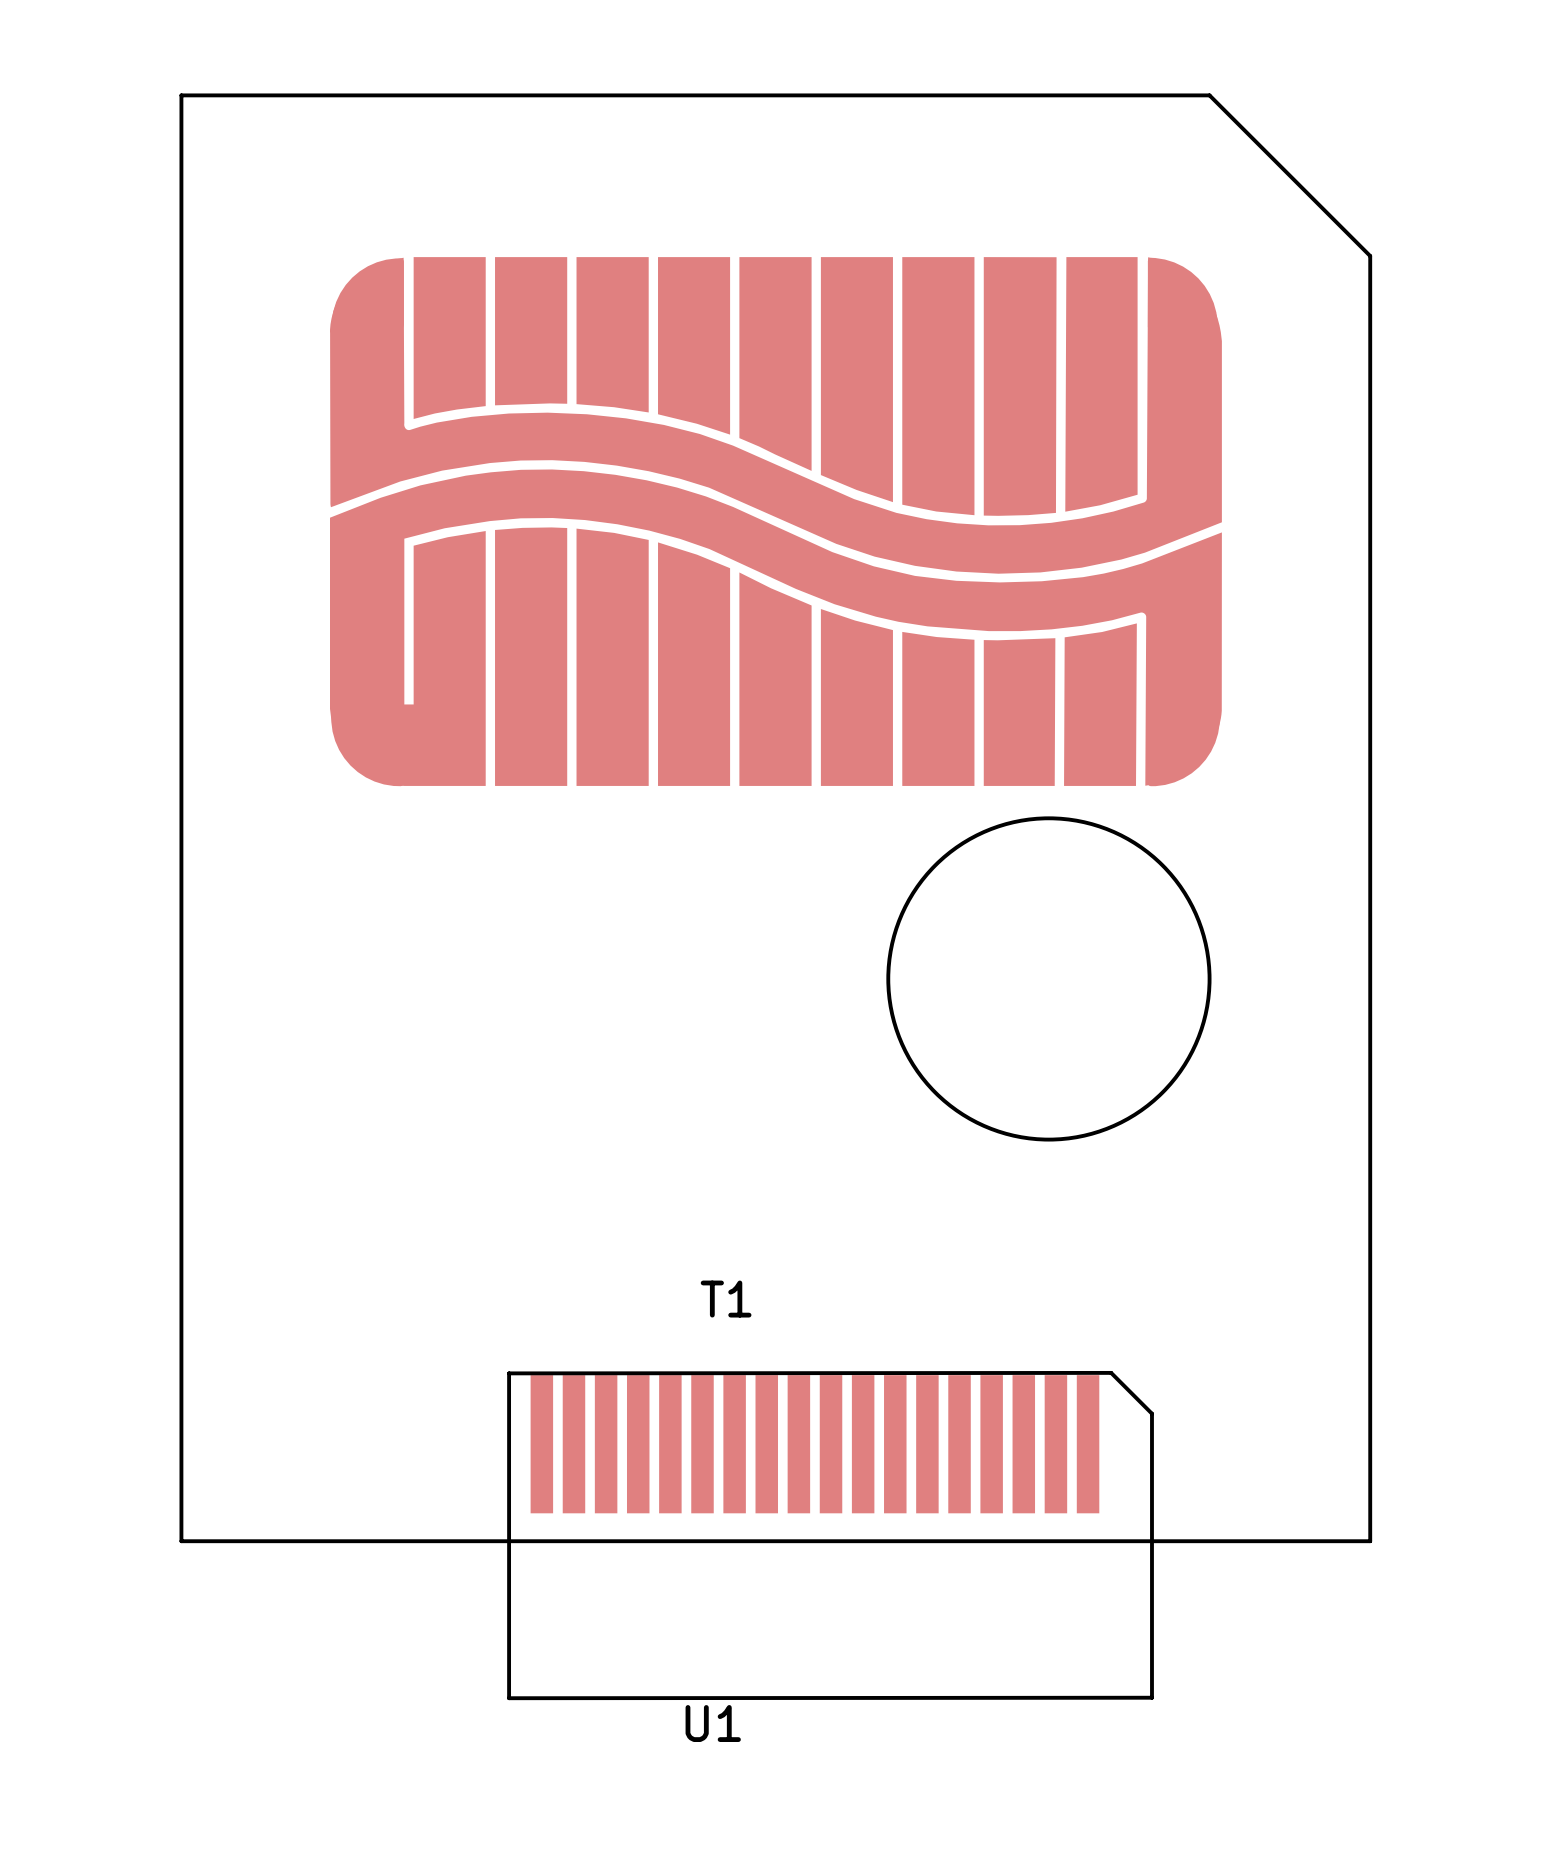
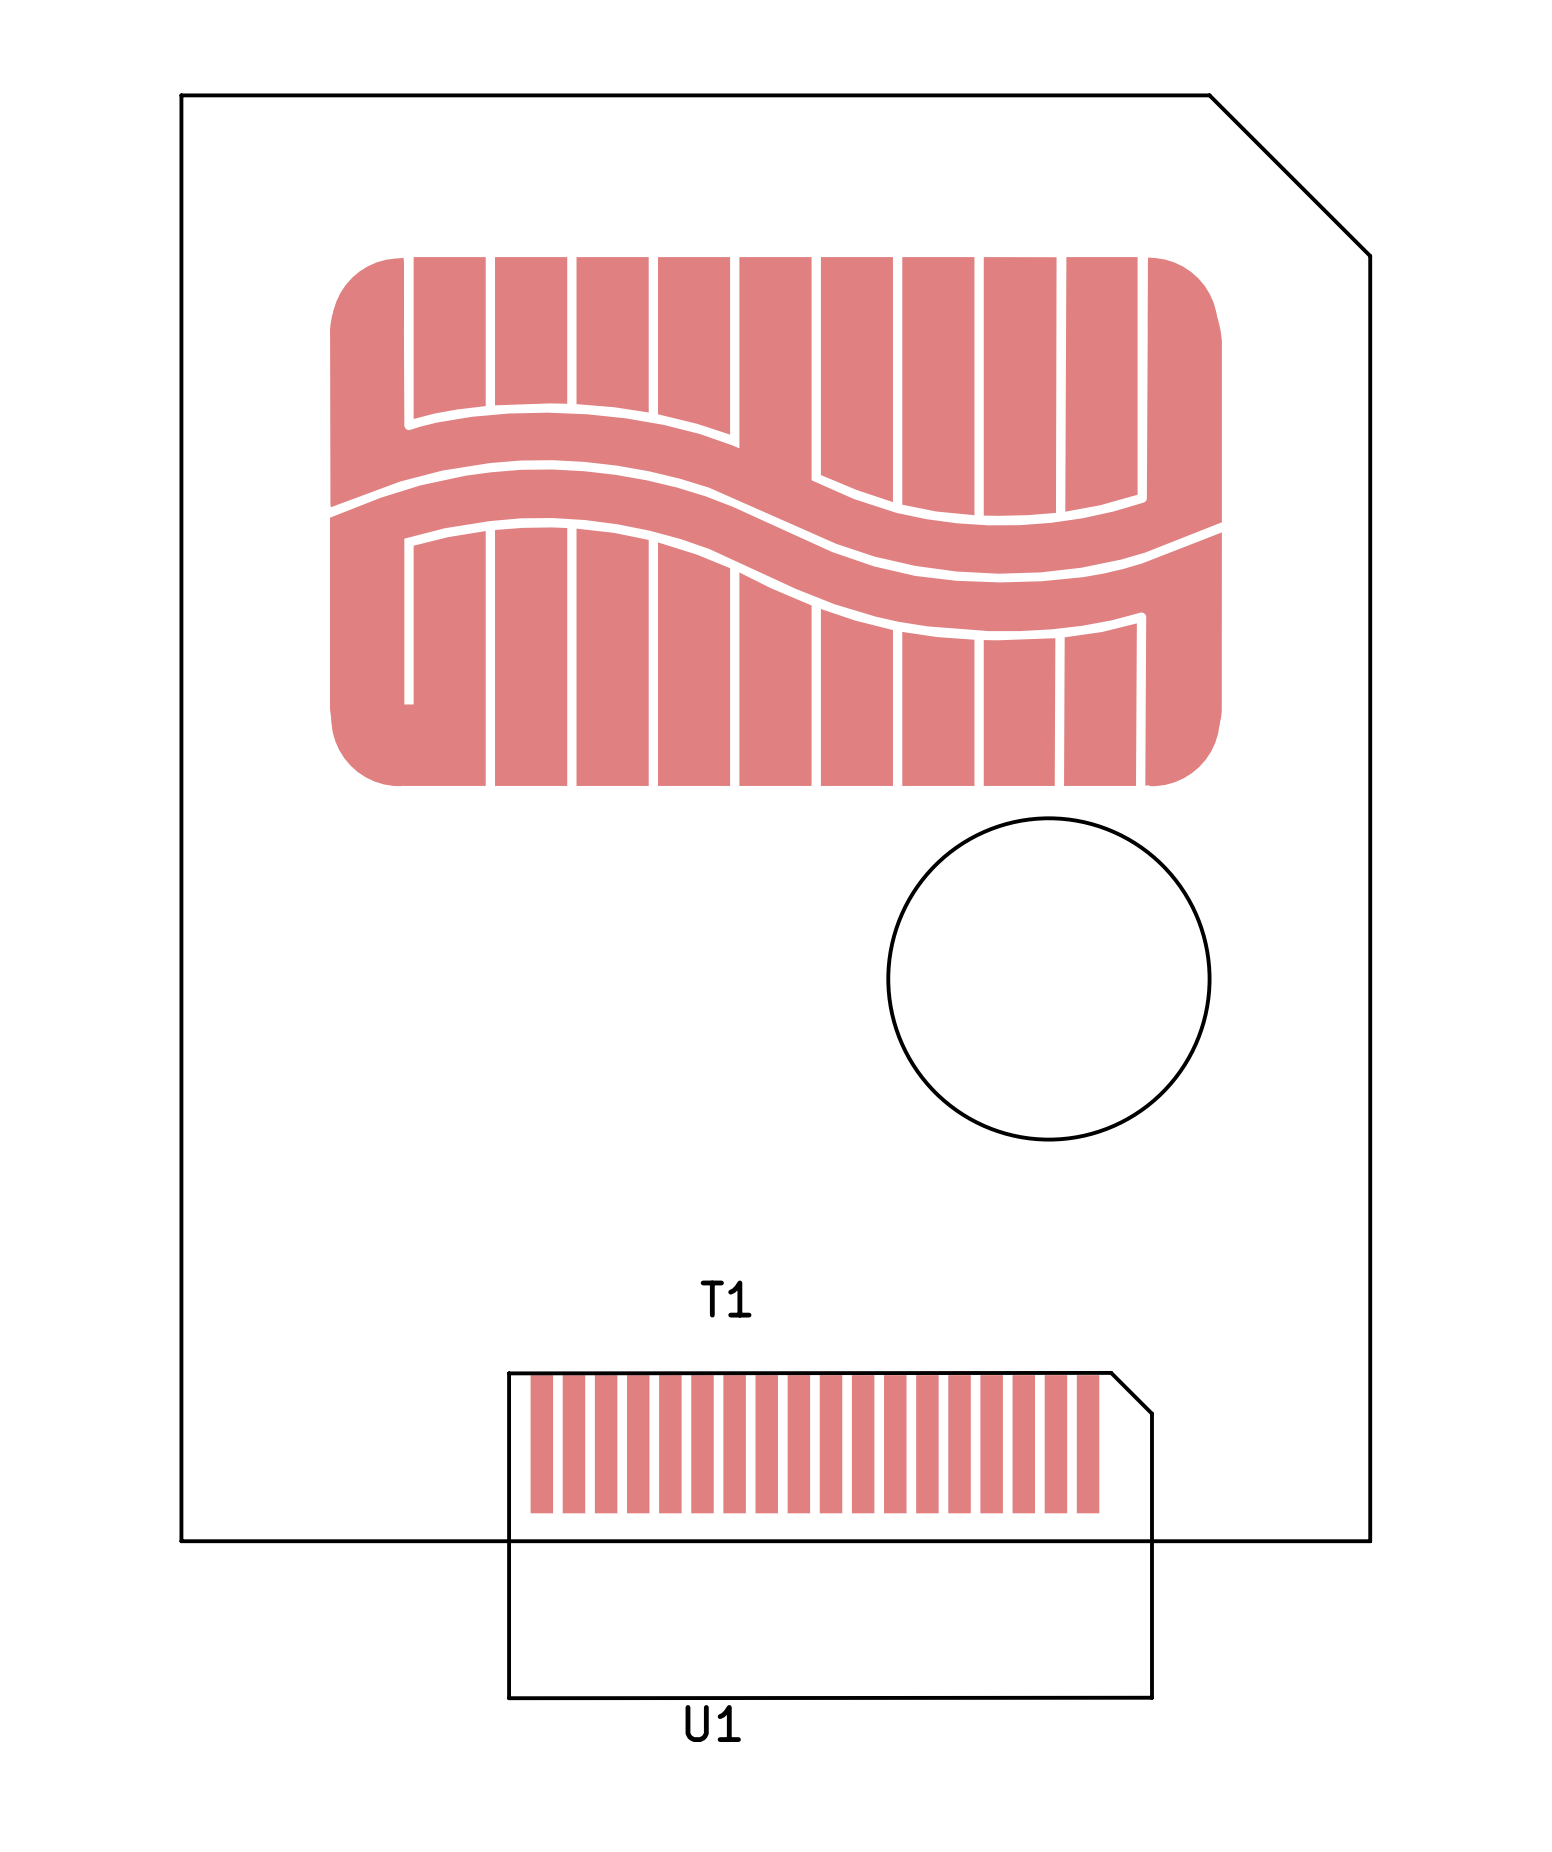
T1 footprint: [179, 93, 1373, 1544] -> [179, 93, 1373, 1544]

